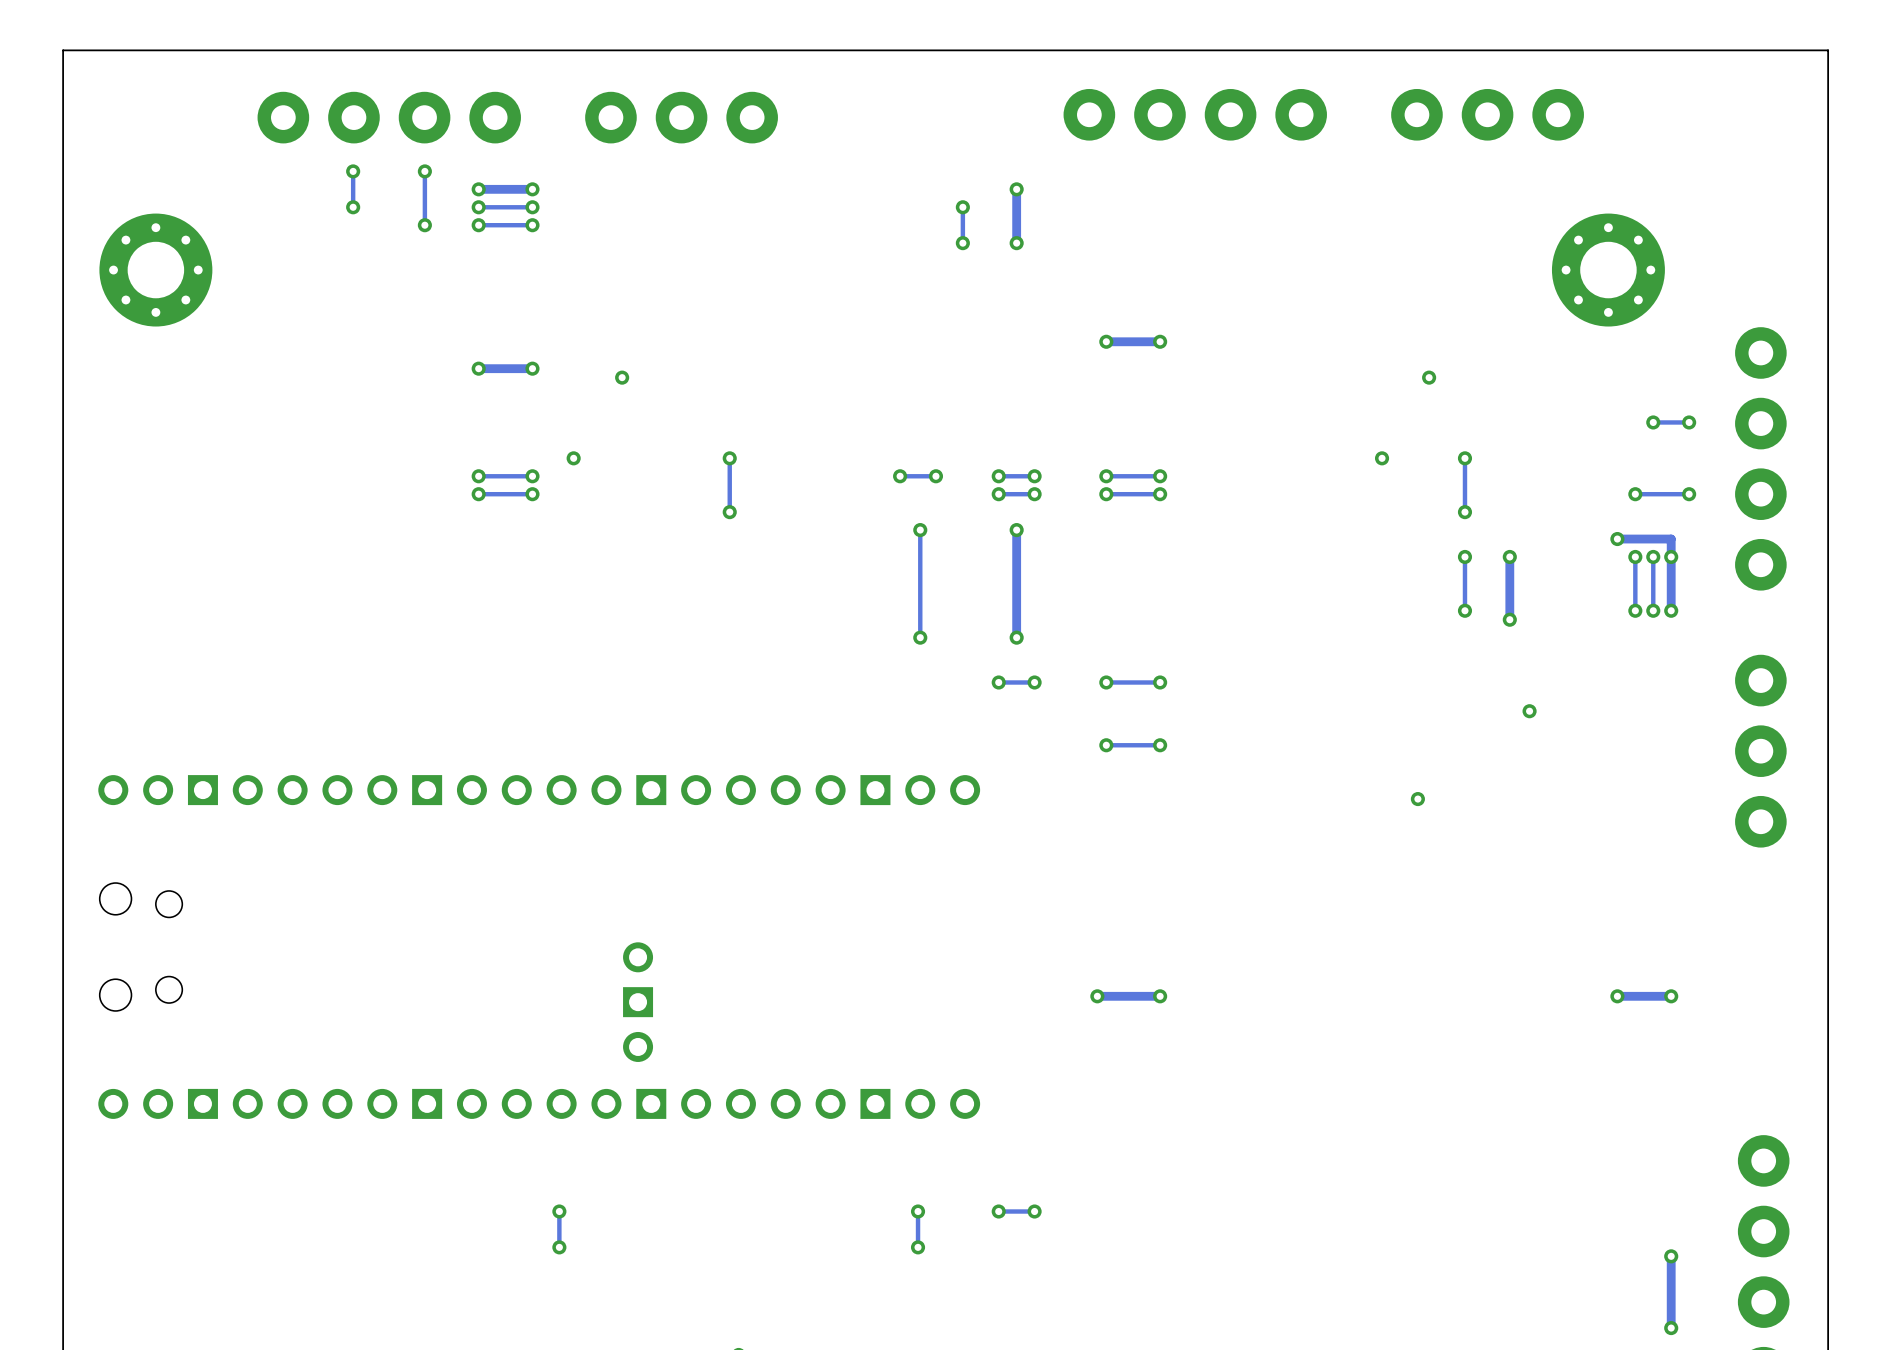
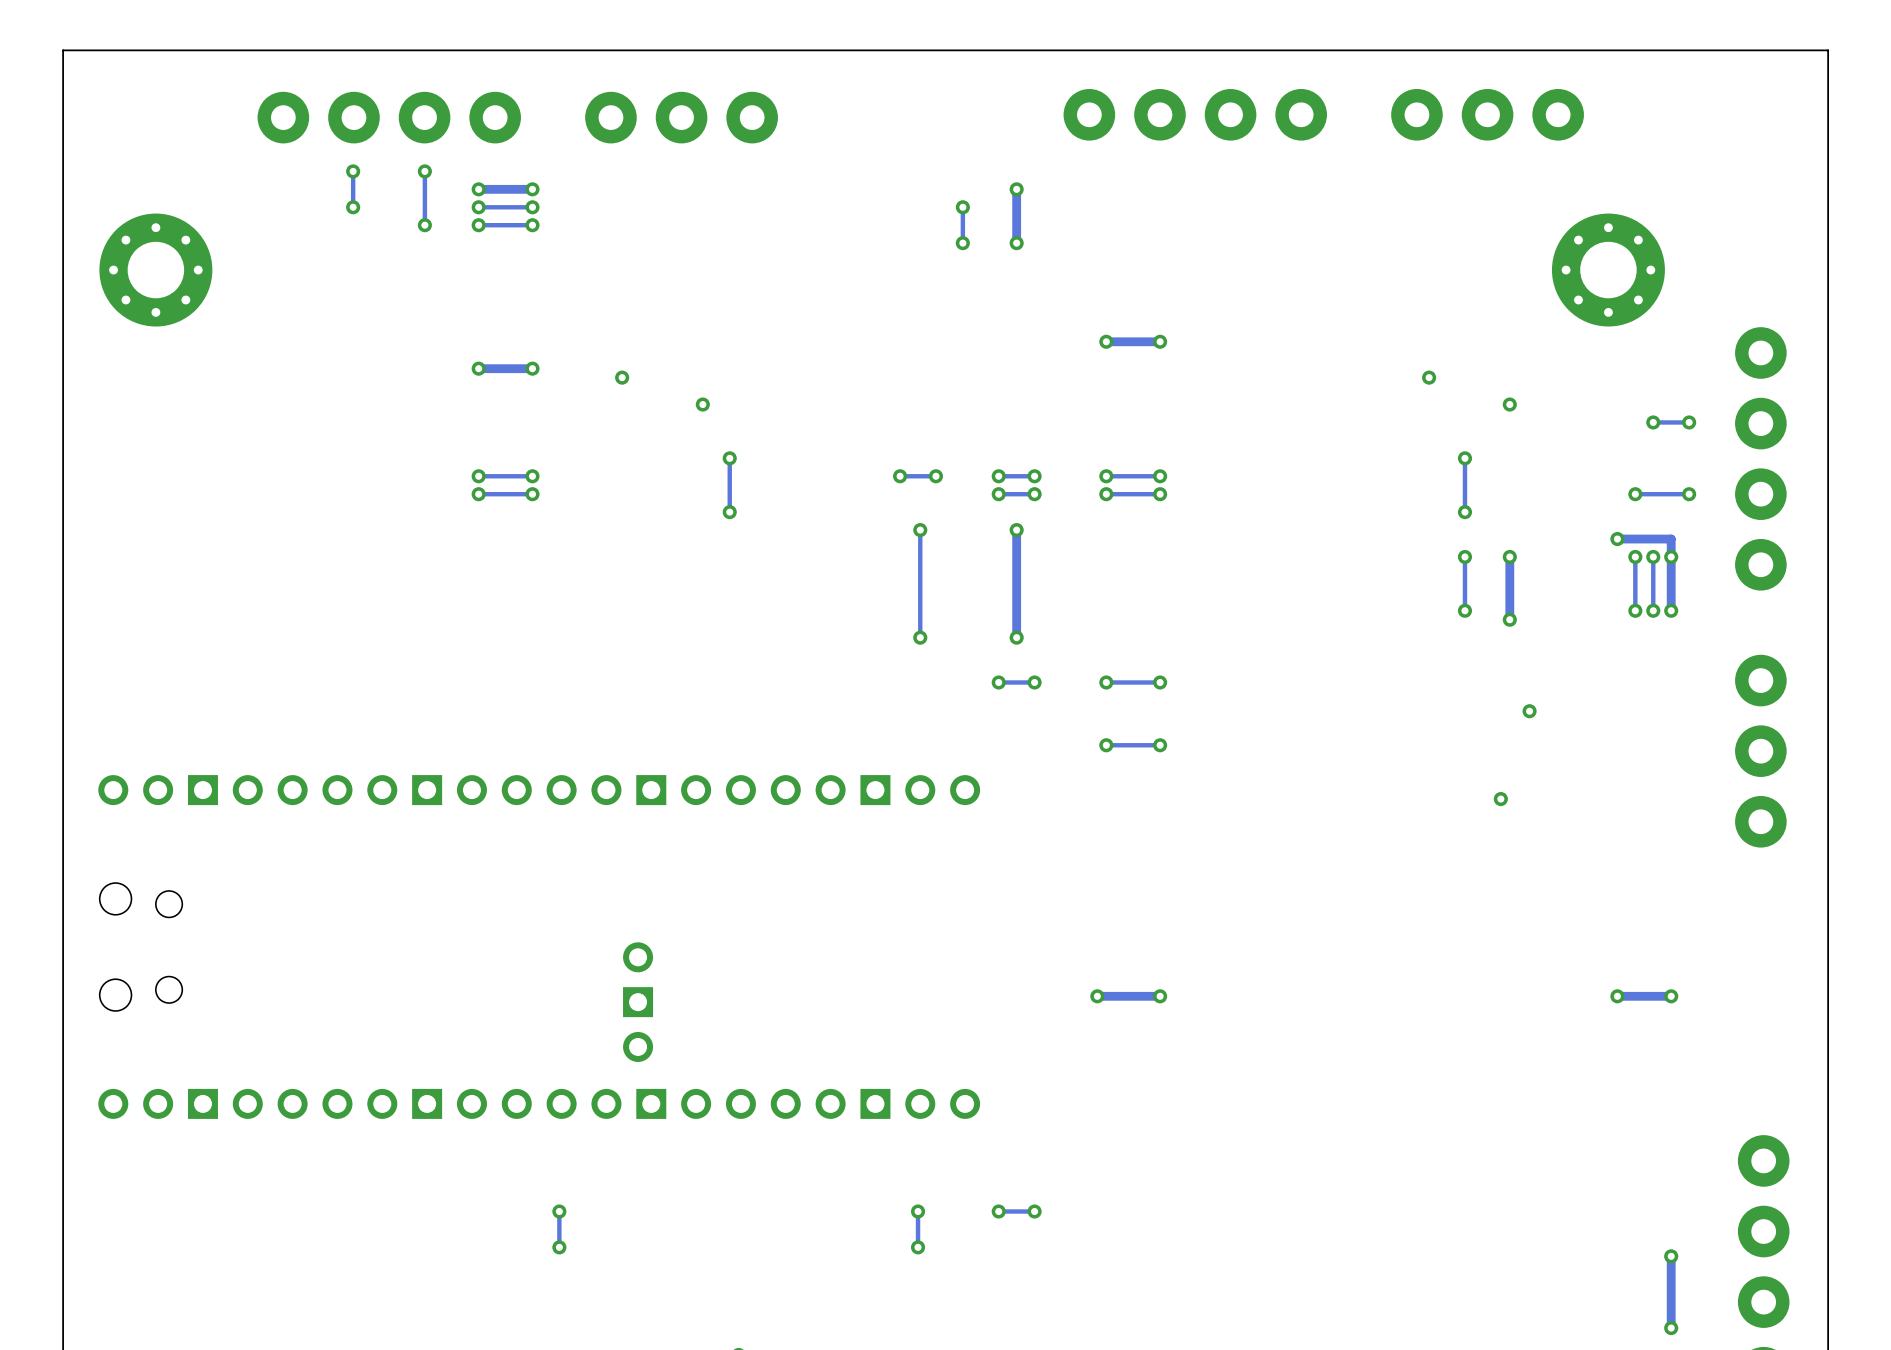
via: none -> (702, 404)
via: none -> (1509, 404)
via: (573, 458) -> none
via: (1382, 458) -> none
via position: (1417, 799) -> (1500, 799)

